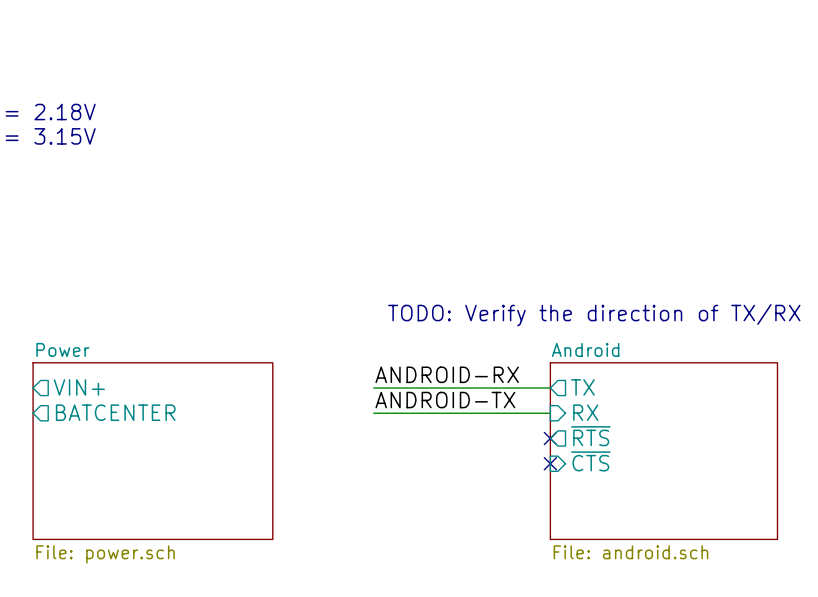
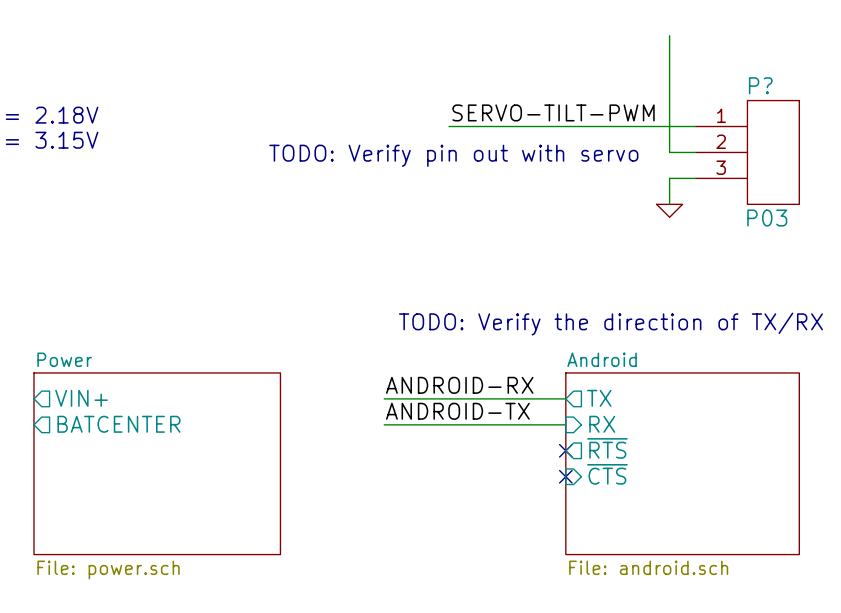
wire: none -> (669, 35) (669, 152) (695, 152)
label: none -> SERVO-TILT-PWM (553, 112)
wire: none -> (449, 126) (695, 126)
P?: none -> P03 (747, 152)
text: none -> TODO: Verify pin out with servo (453, 155)
wire: none -> (695, 178) (669, 178) (669, 204)
power symbol: none -> (669, 210)

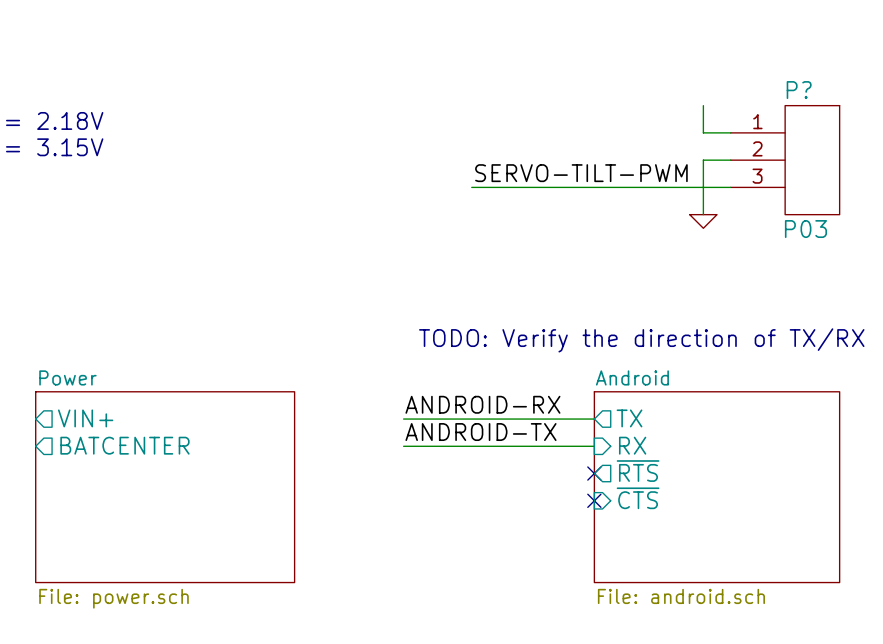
wire: (669, 35) (669, 100) -> none
label position: SERVO-TILT-PWM (553, 112) -> SERVO-TILT-PWM (581, 173)
wire: (449, 126) (669, 126) (669, 152) -> (471, 187) (703, 187) (703, 160)
text: TODO: Verify pin out with servo (453, 155) -> none

